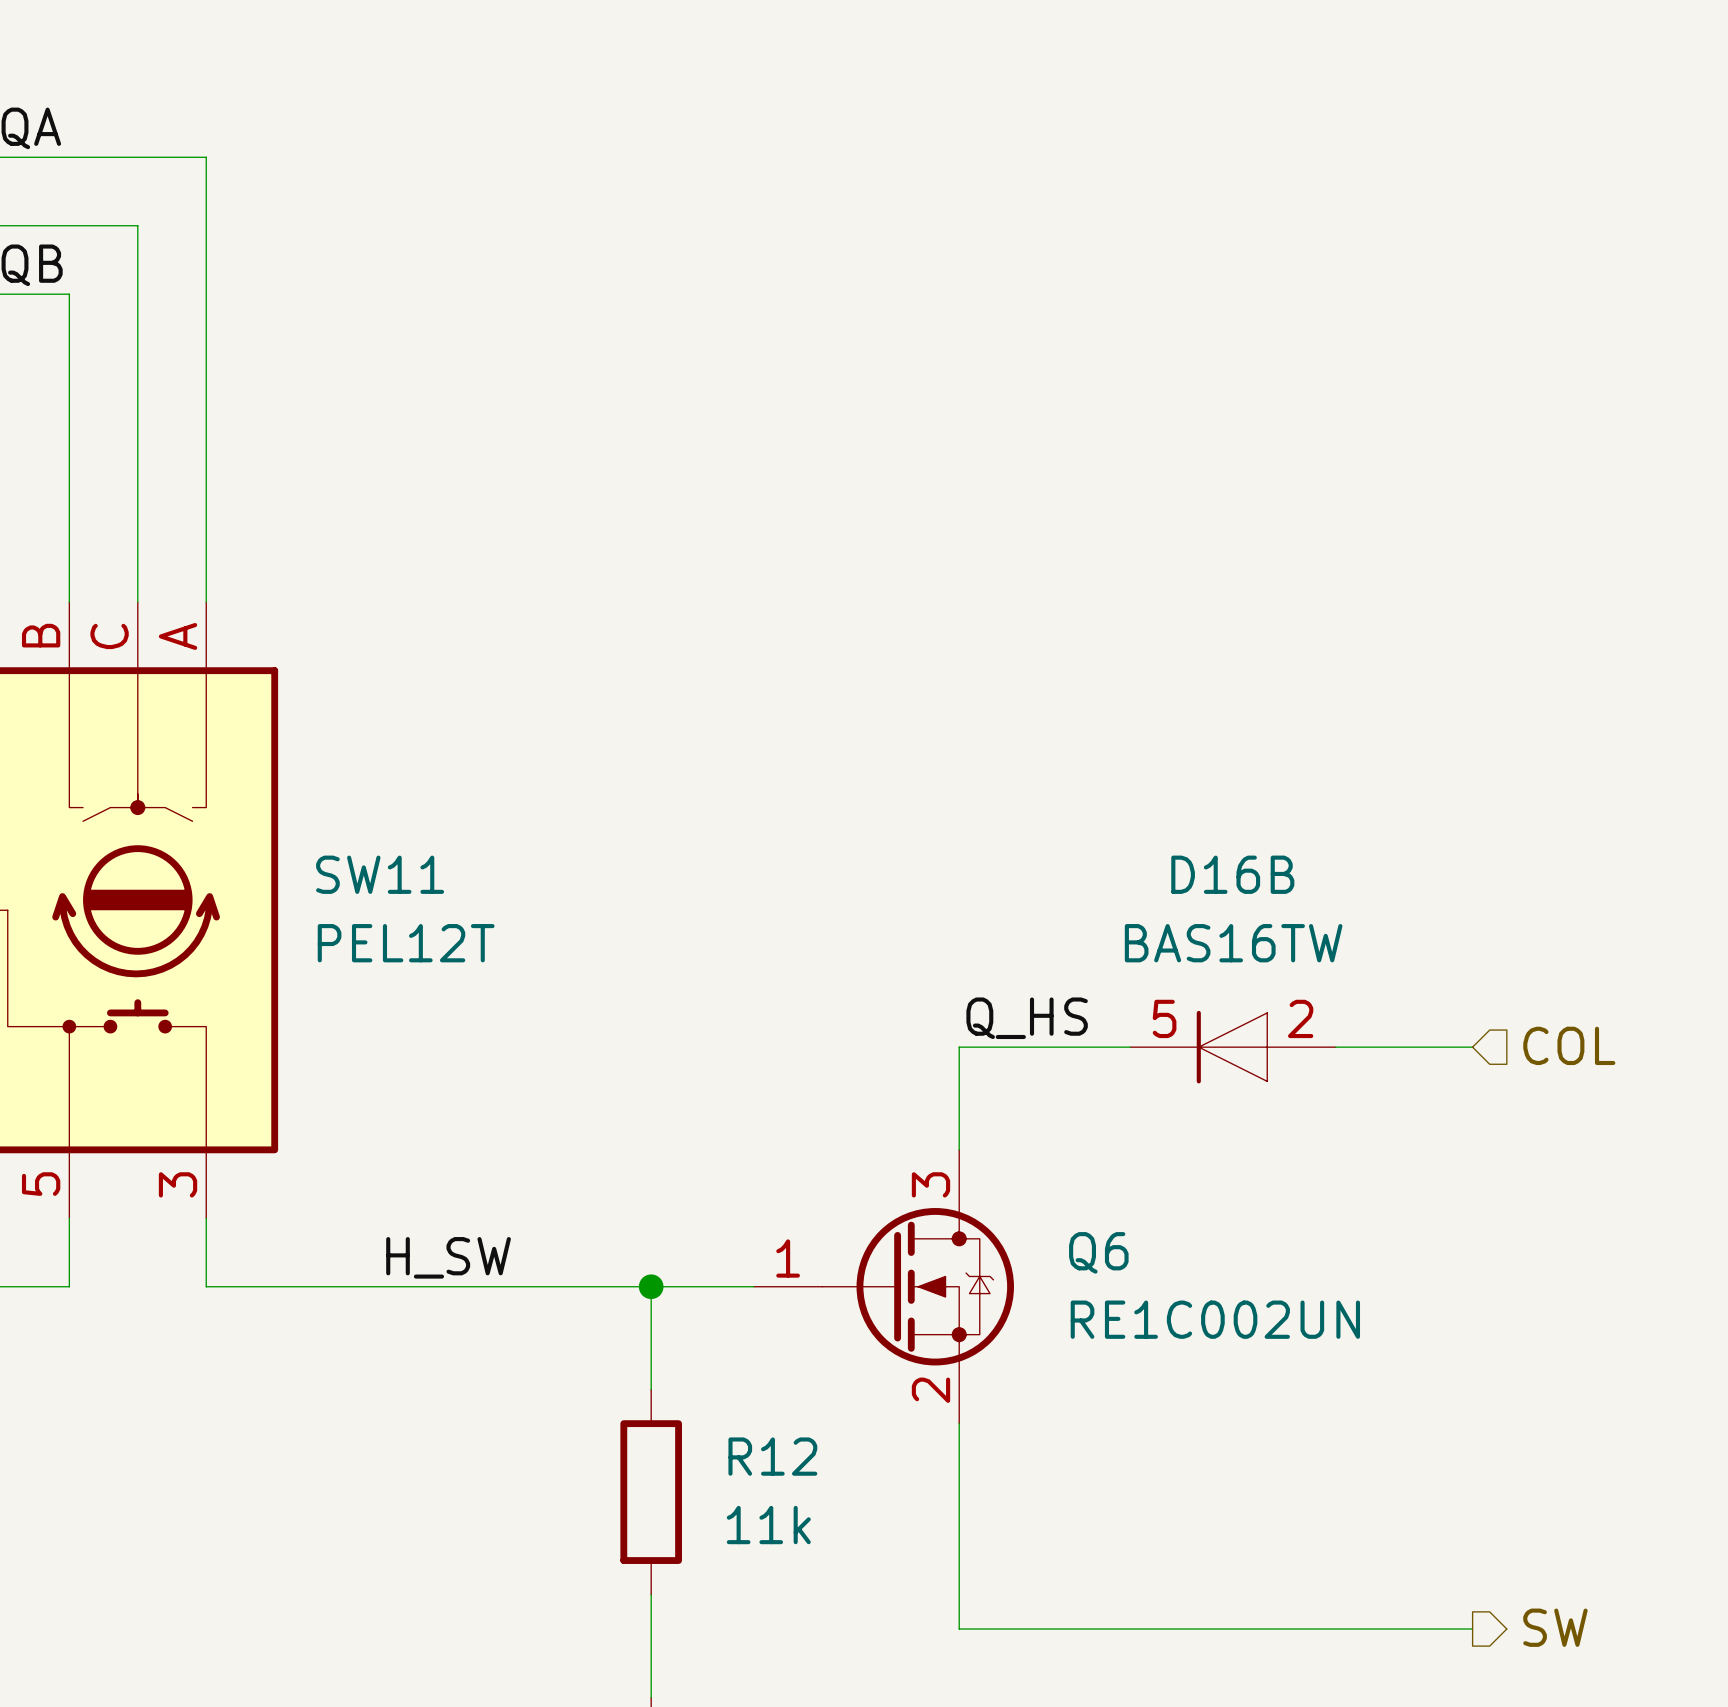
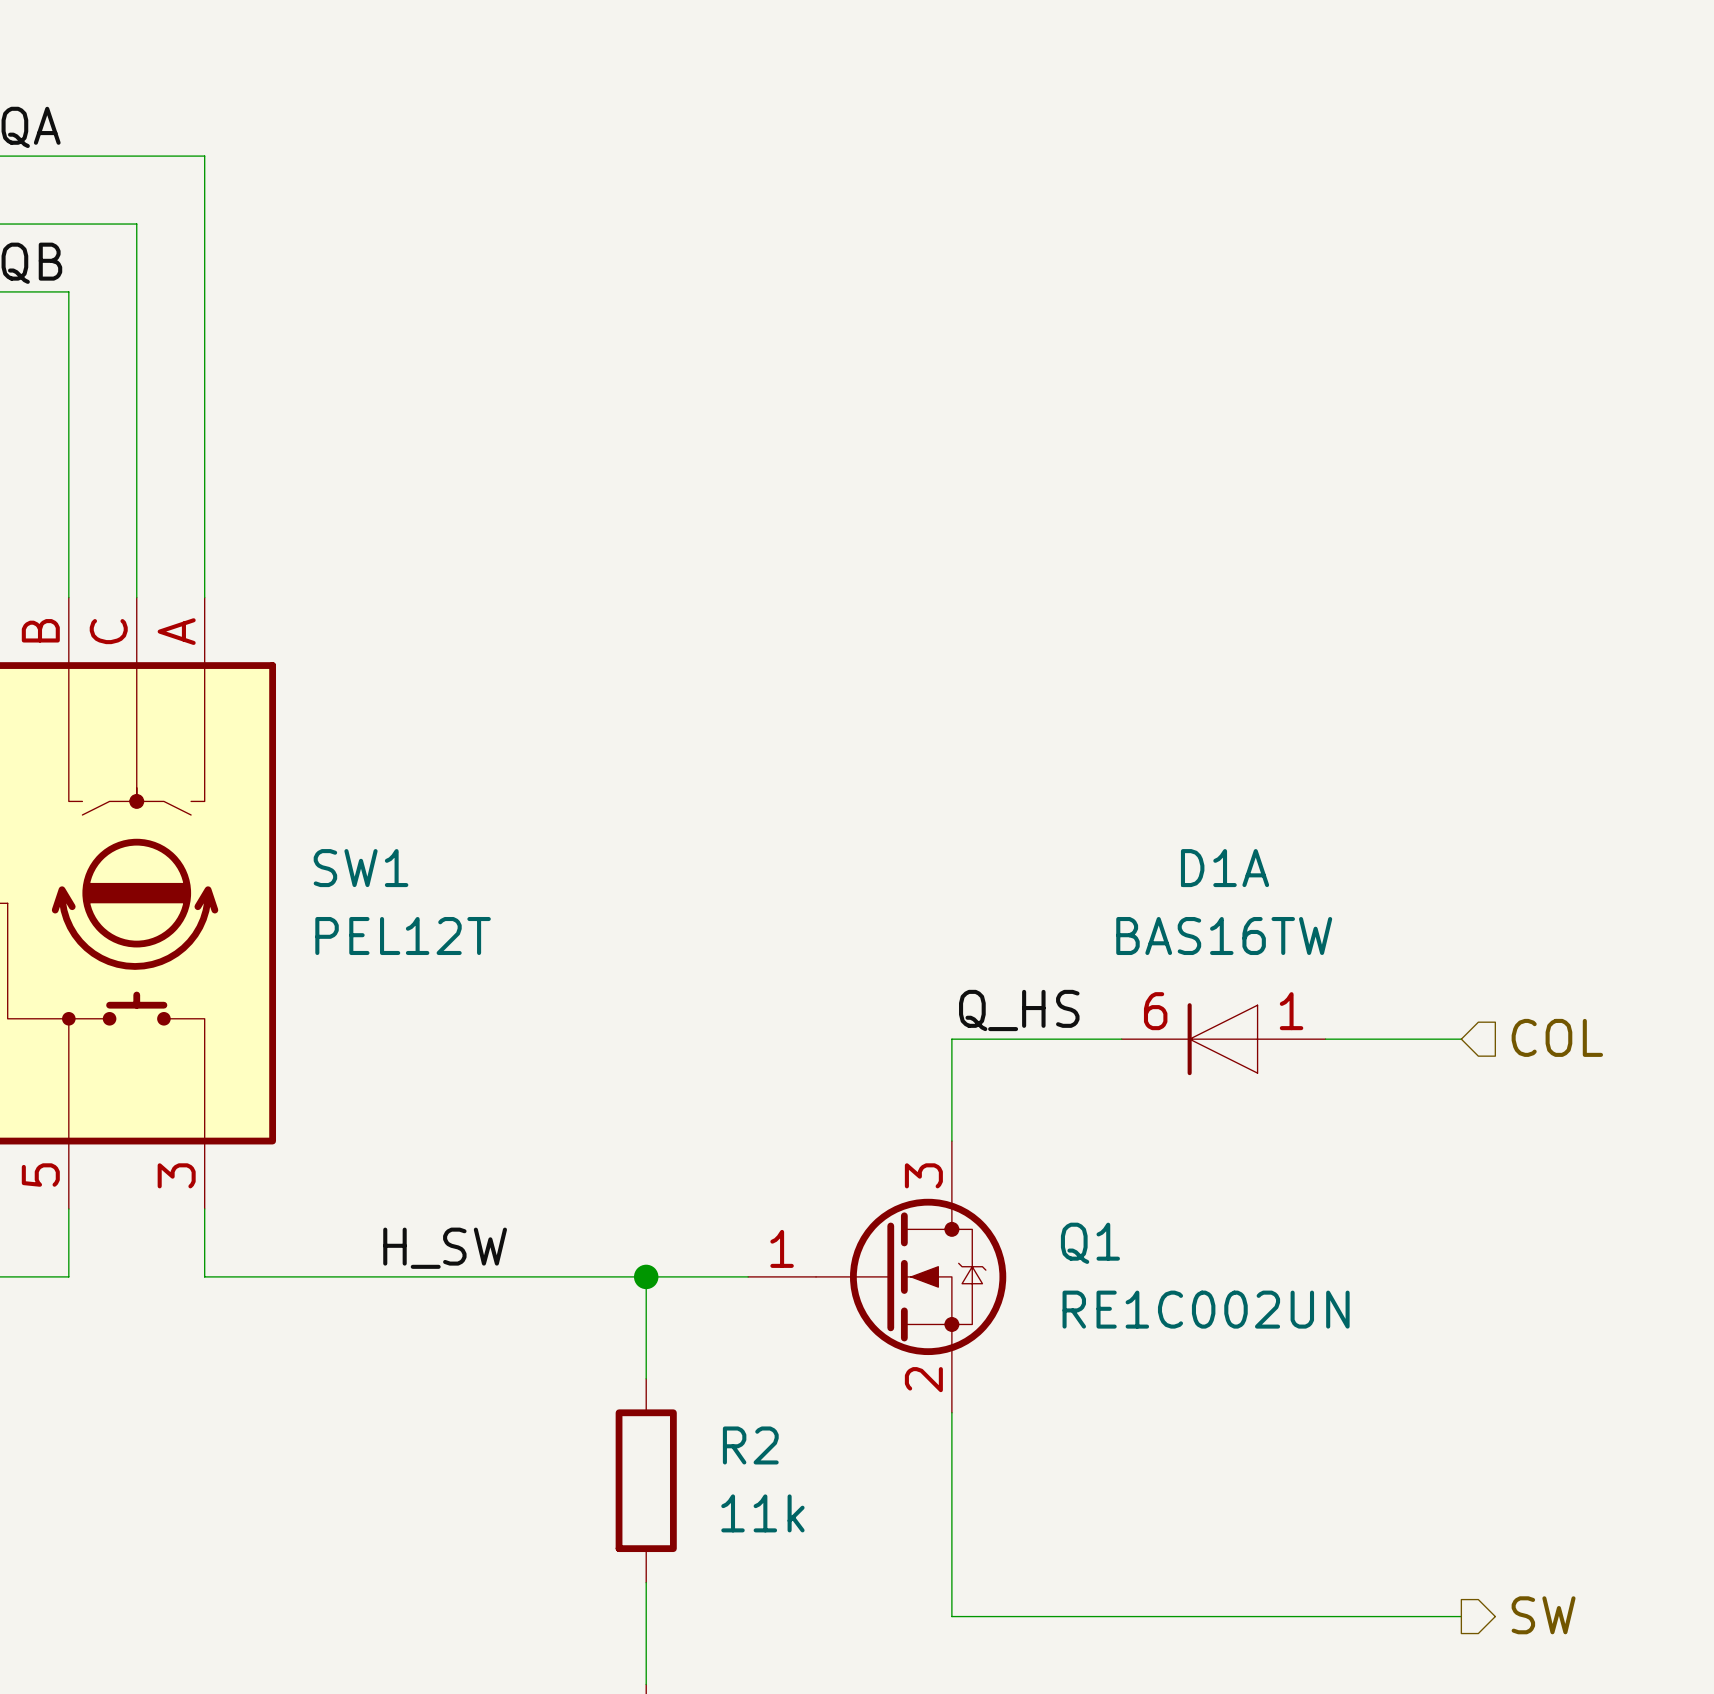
SW11 name: SW11 (380, 874) -> SW1 (361, 868)
D16B name: D16B (1232, 874) -> D1A (1225, 868)
D16B pin number: 5 (1164, 1018) -> 6 (1155, 1011)
D16B pin number: 2 (1300, 1018) -> 1 (1291, 1011)
Q6 name: Q6 (1098, 1252) -> Q1 (1090, 1243)
R12 name: R12 (772, 1456) -> R2 (750, 1445)

